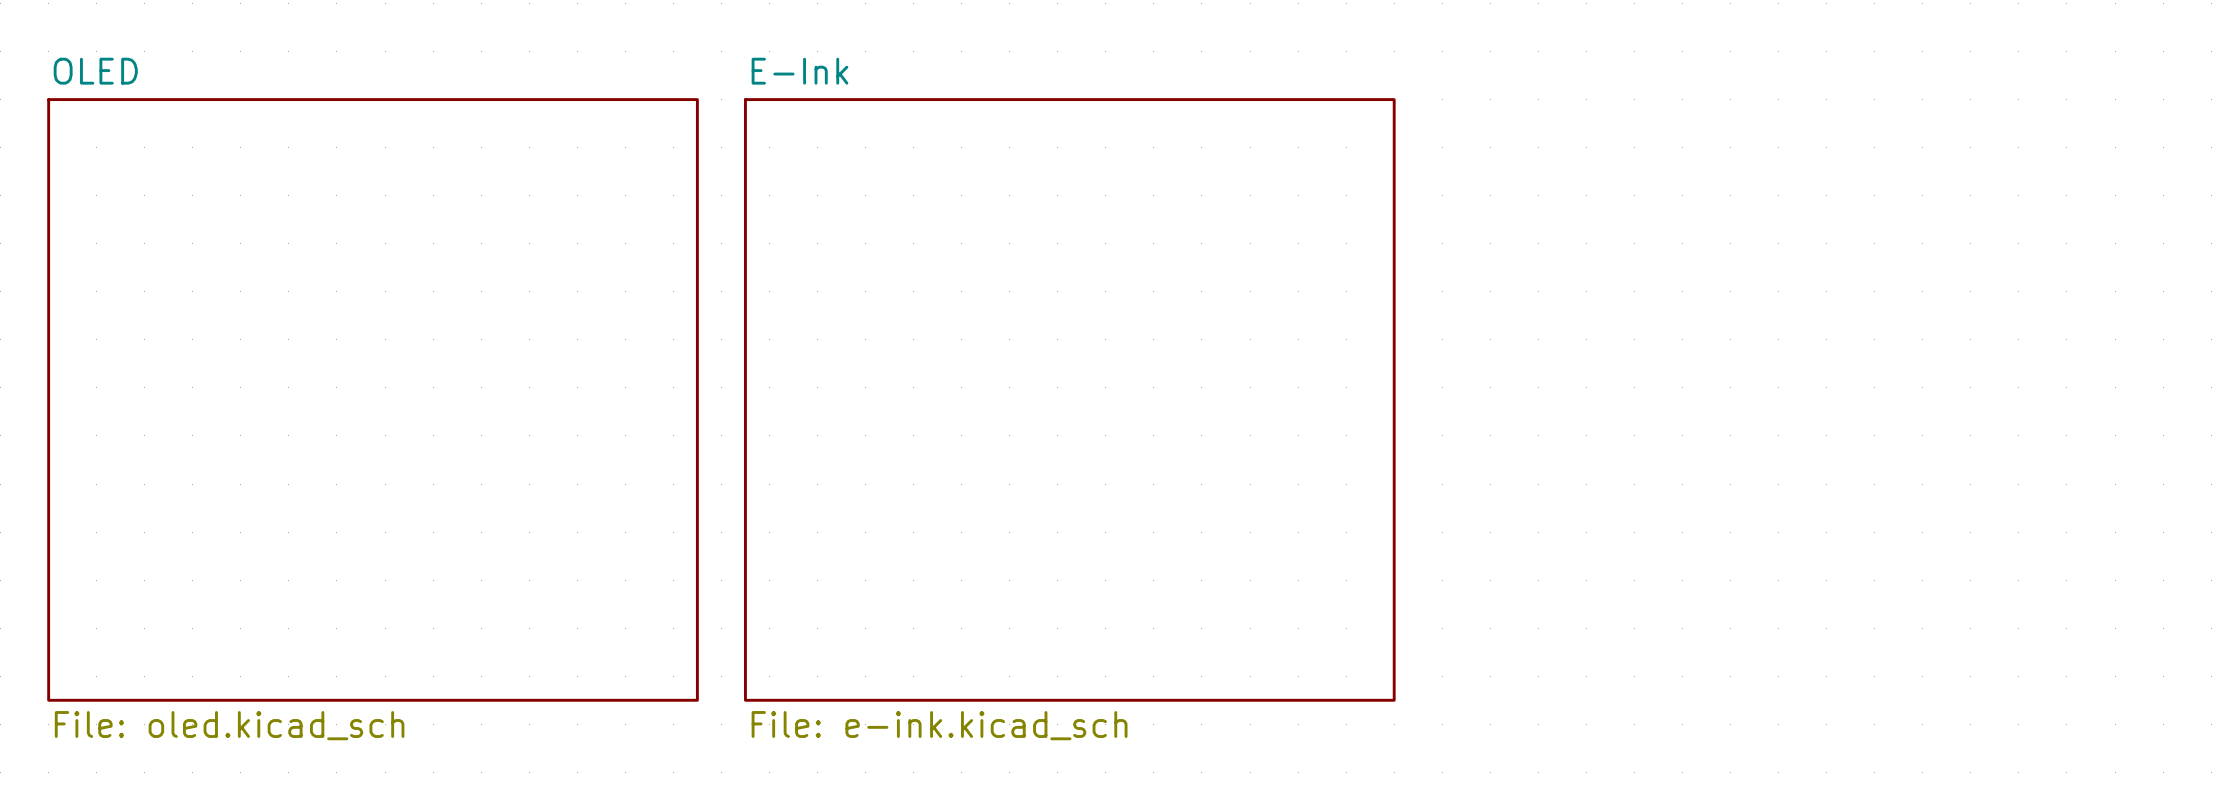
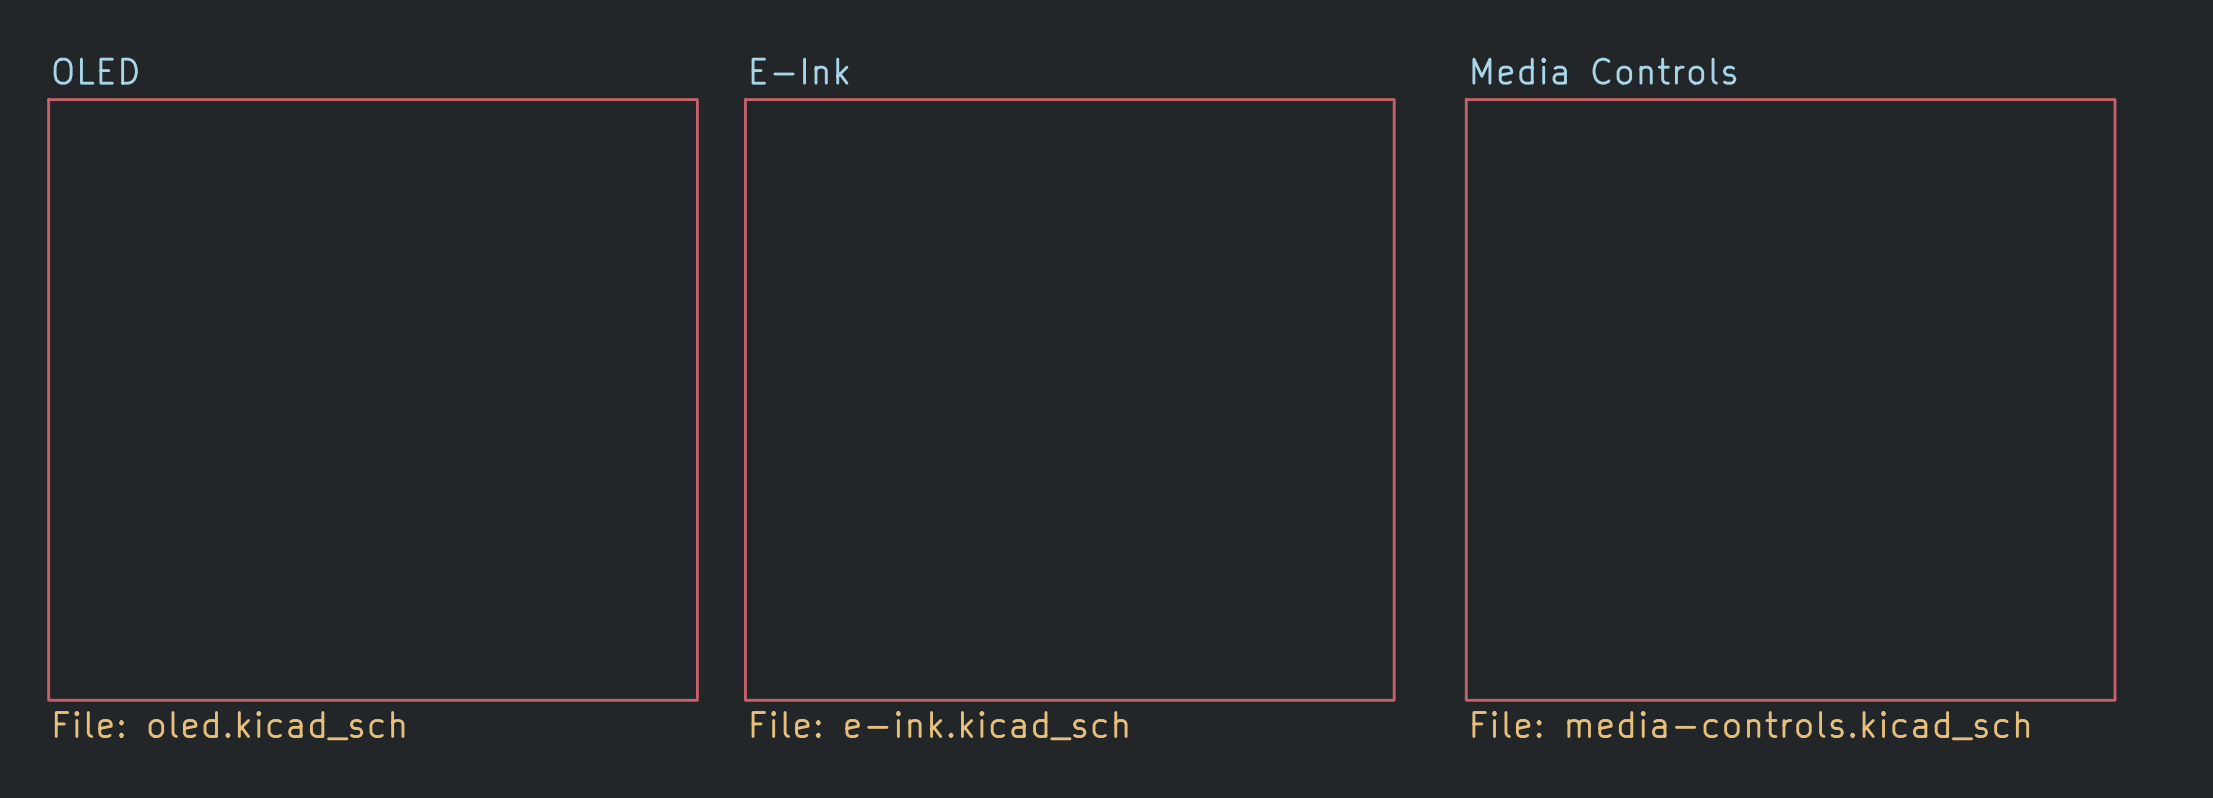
sheet Media Controls: none -> File: media-controls.kicad_sch (1790, 399)

